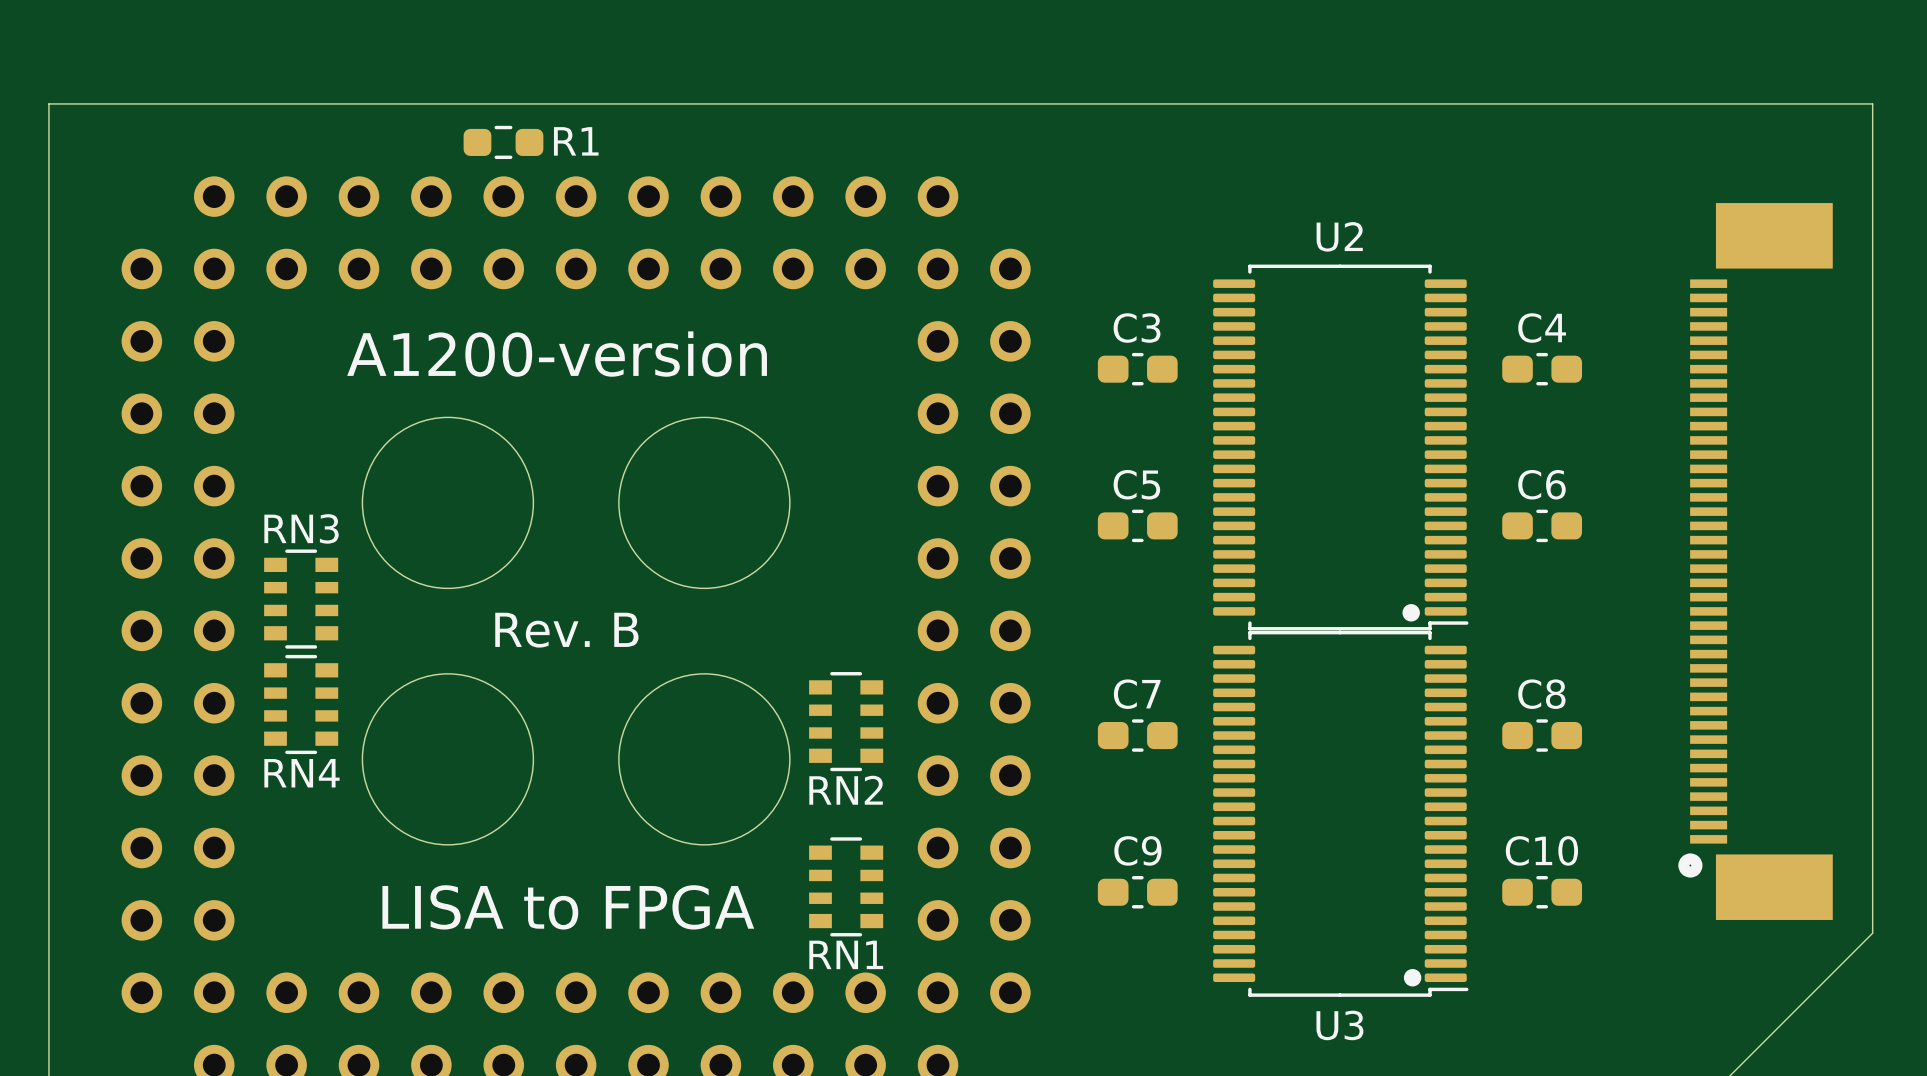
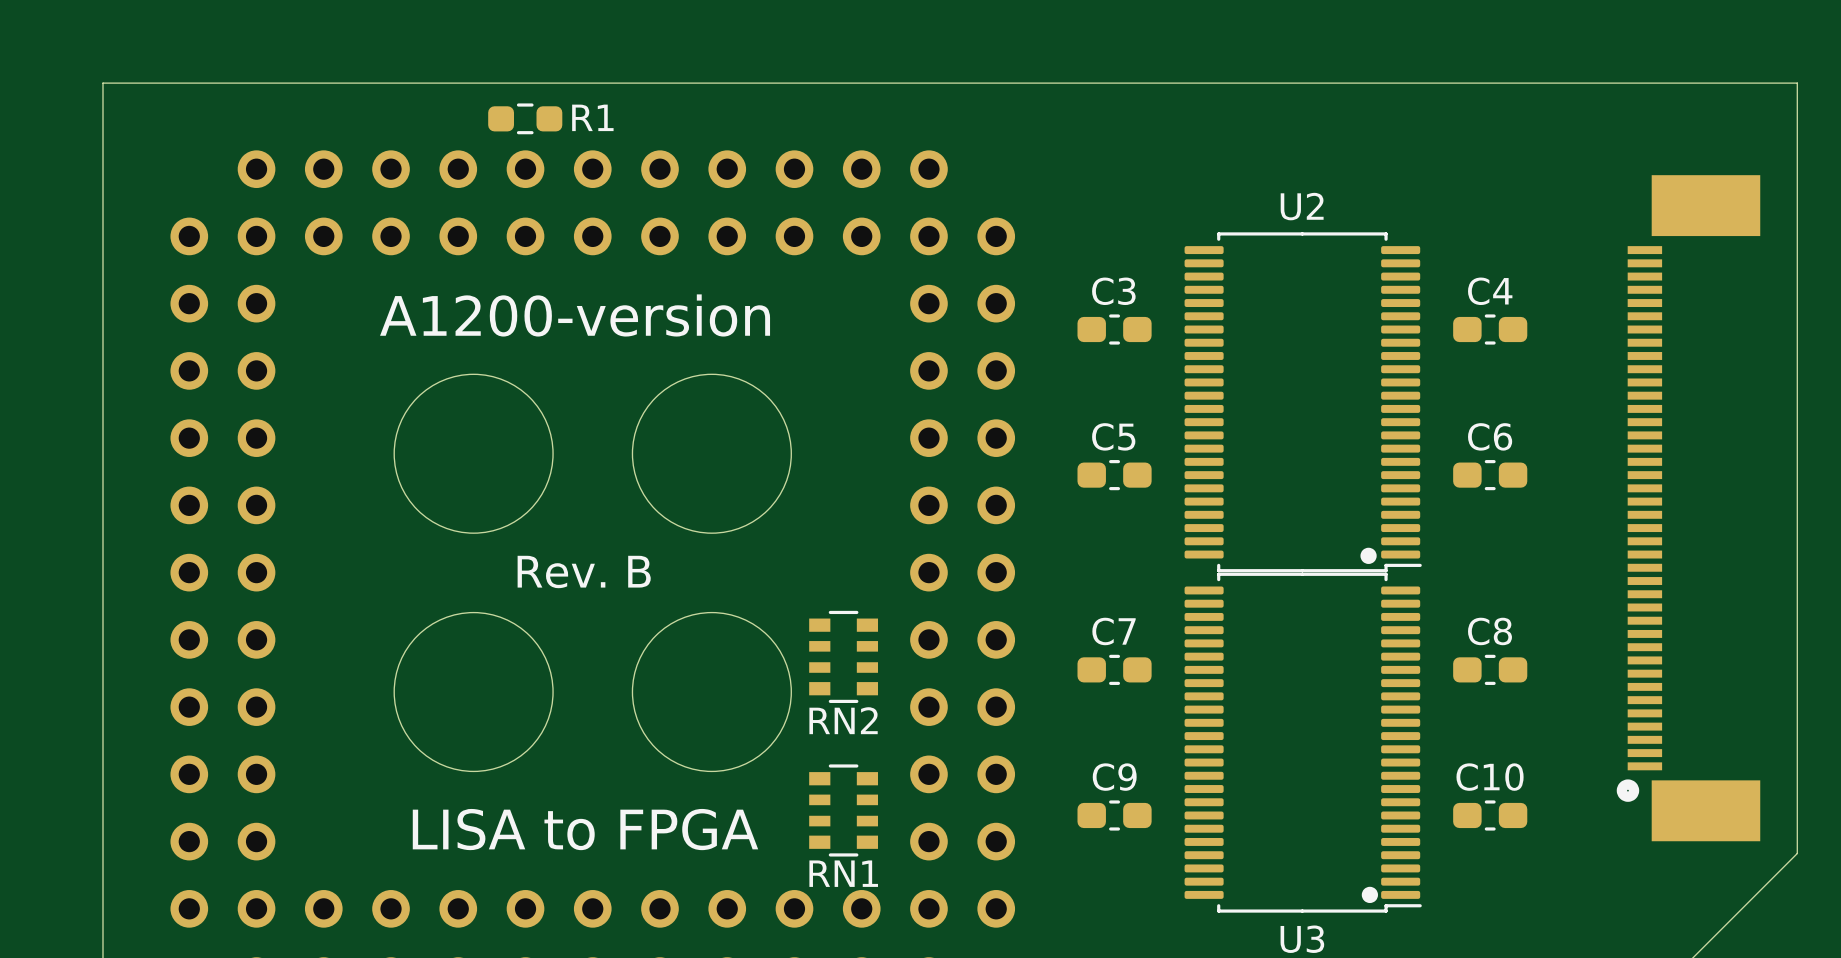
RN3: (301, 599) -> none
RN4: (301, 704) -> none

